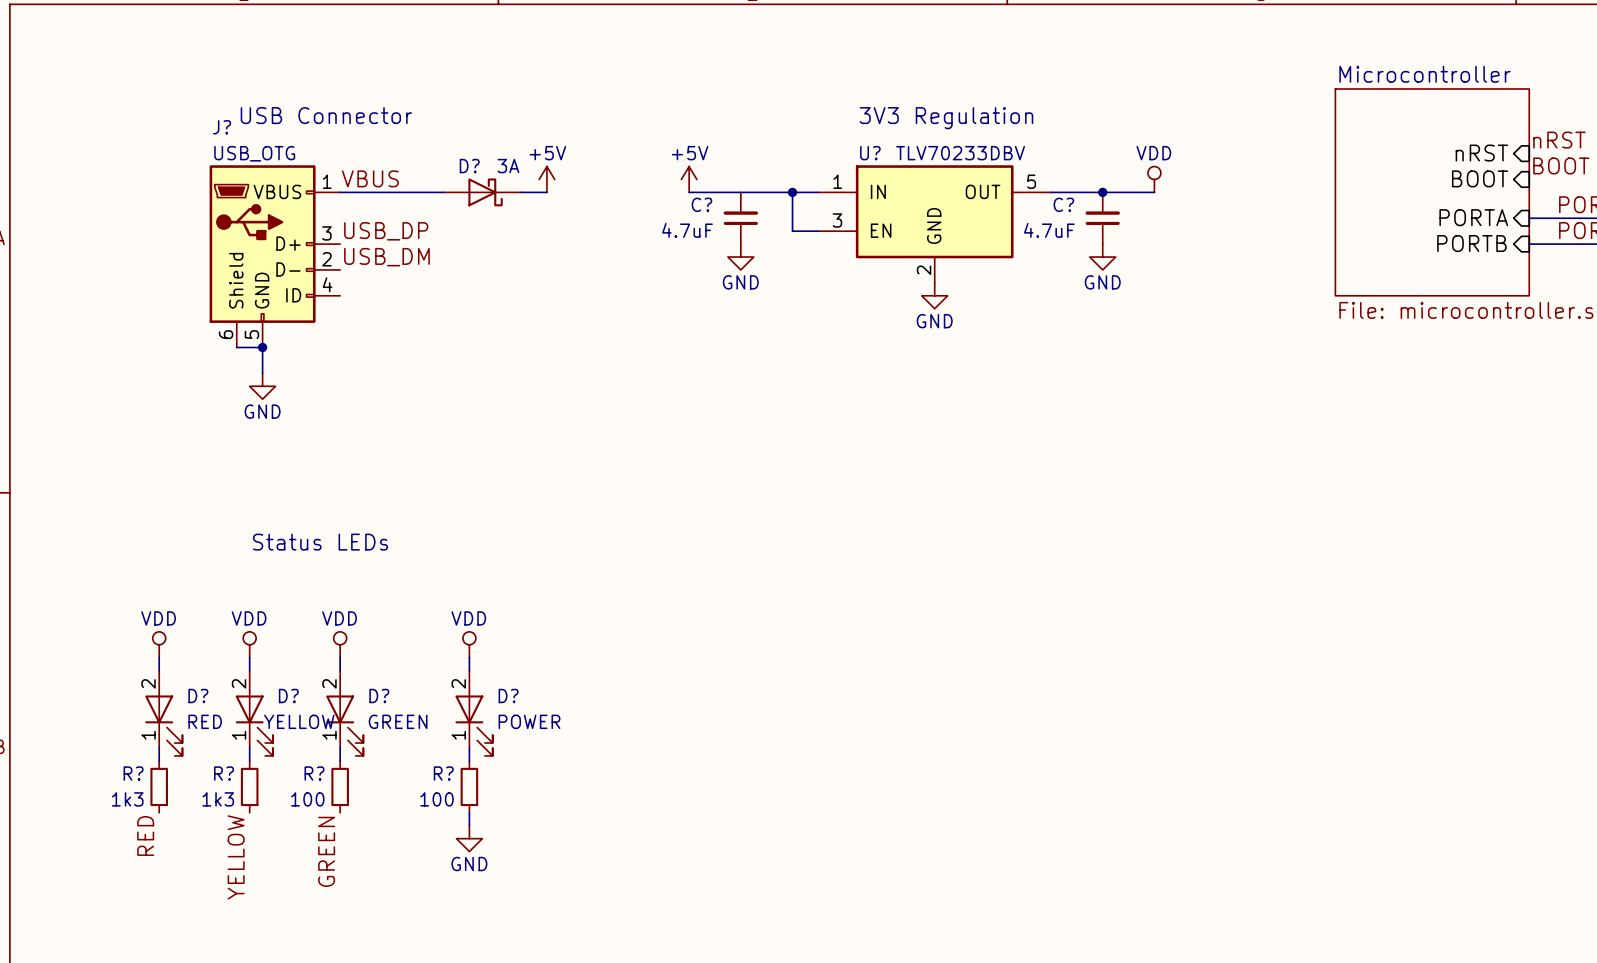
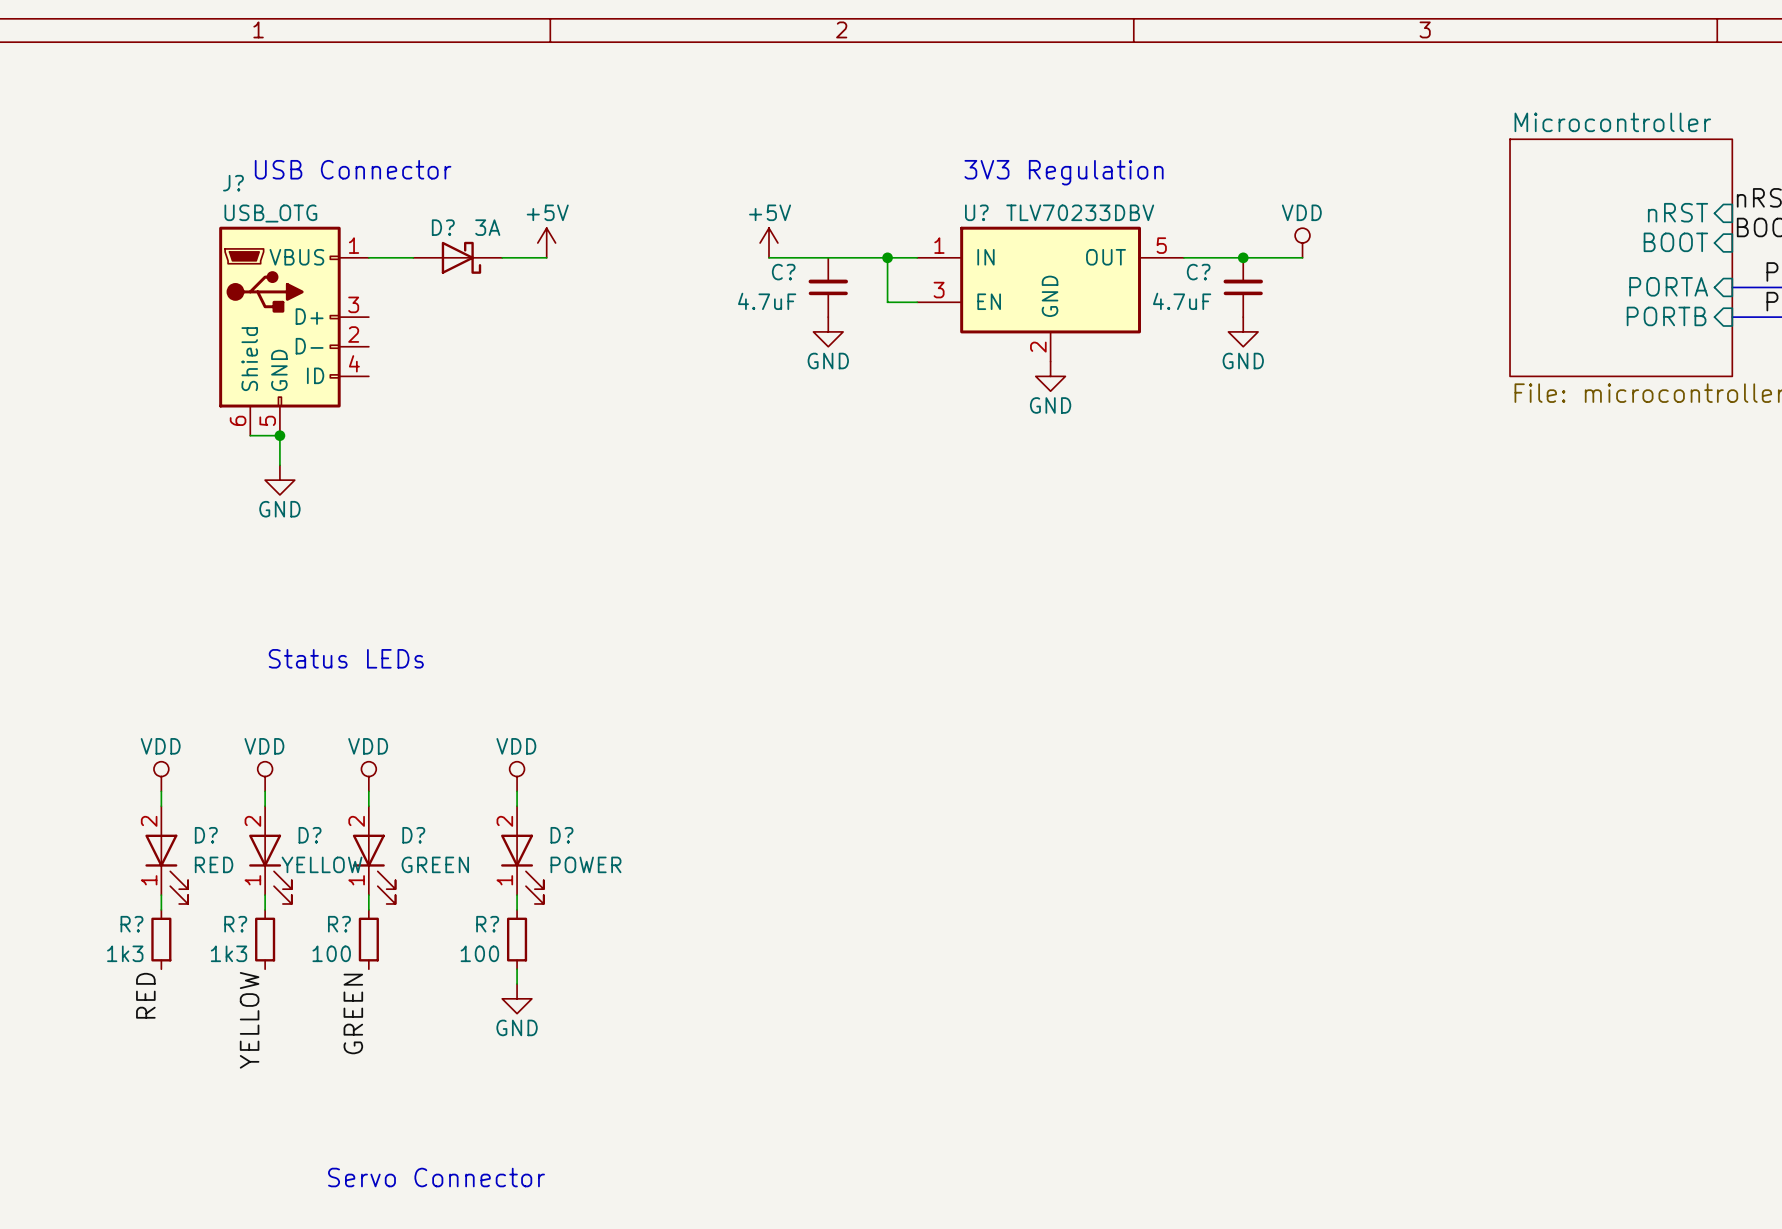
label: VBUS (370, 178) -> none
power symbol position: +5V (546, 179) -> +5V (546, 243)
D? position: (482, 192) -> (457, 257)
wire: (521, 192) (546, 192) -> none
label: USB_DP (386, 231) -> none
label: USB_DM (386, 257) -> none

